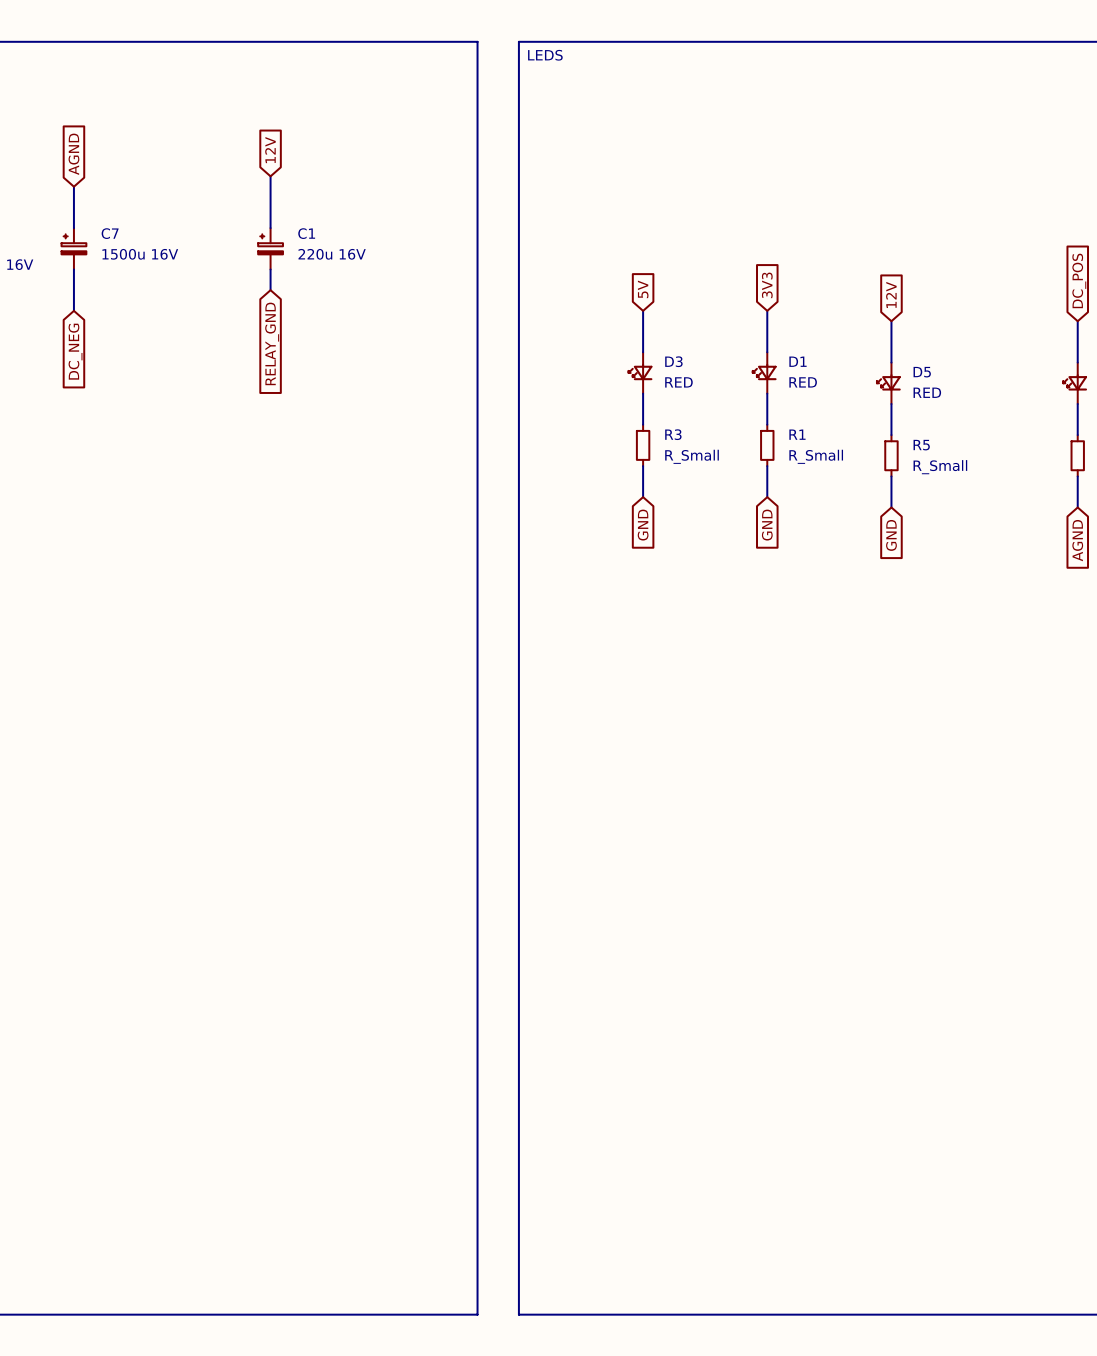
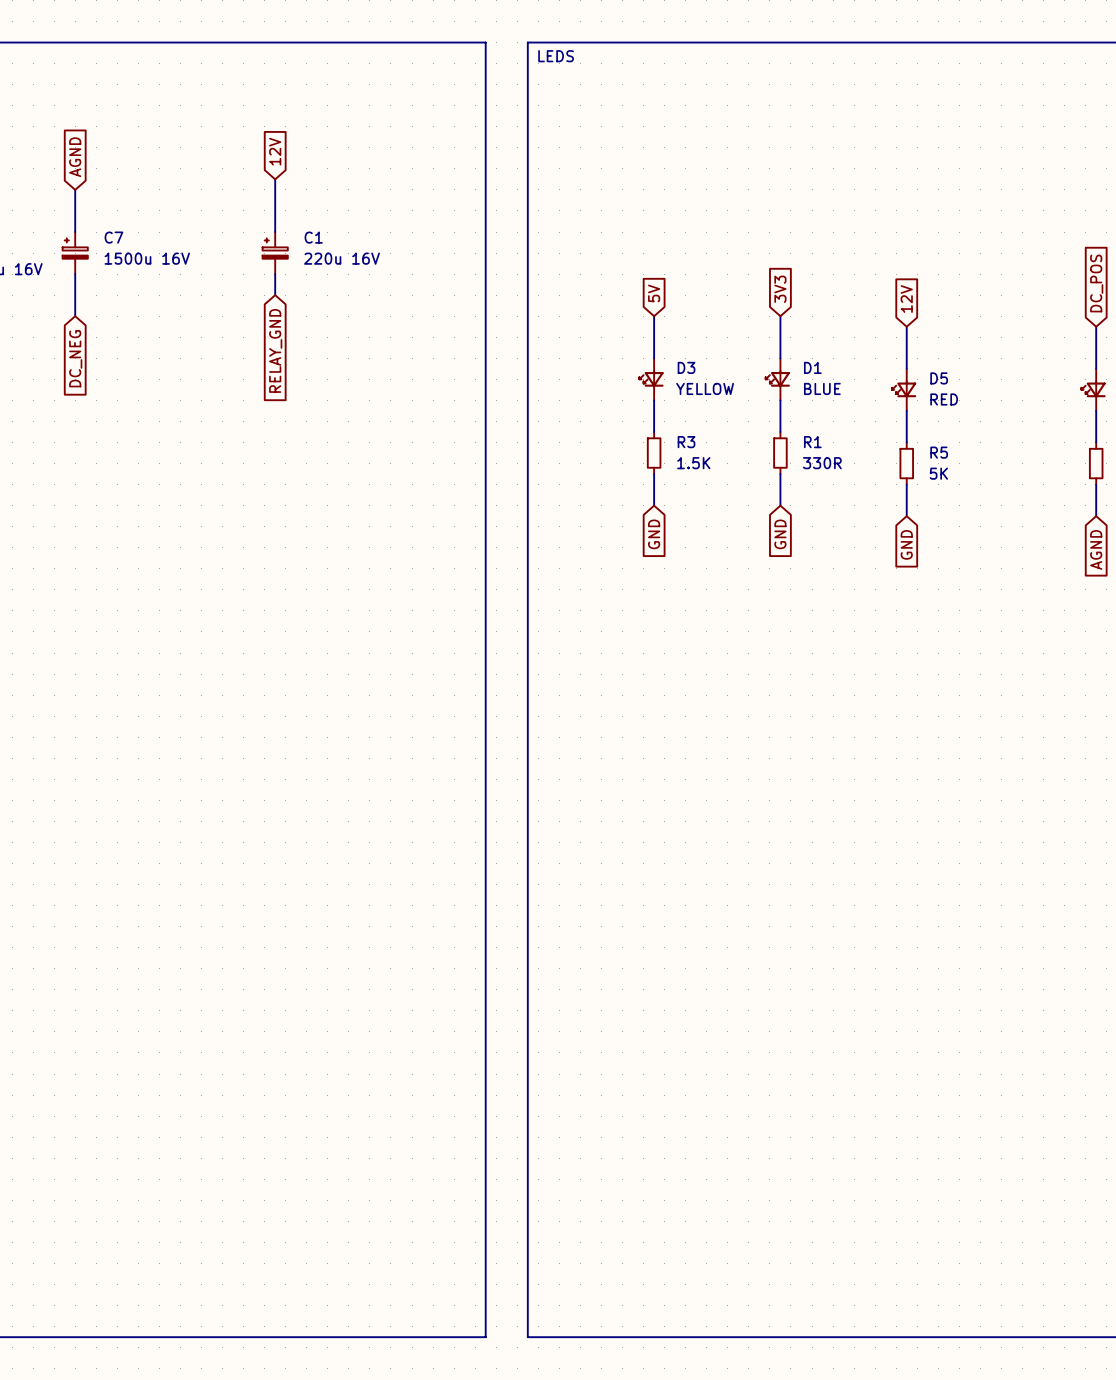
D3 value: RED (678, 382) -> YELLOW (705, 388)
D1 value: RED (803, 382) -> BLUE (822, 388)
R3 value: R_Small (692, 456) -> 1.5K (693, 463)
R1 value: R_Small (816, 456) -> 330R (822, 463)
R5 value: R_Small (940, 467) -> 5K (938, 473)

